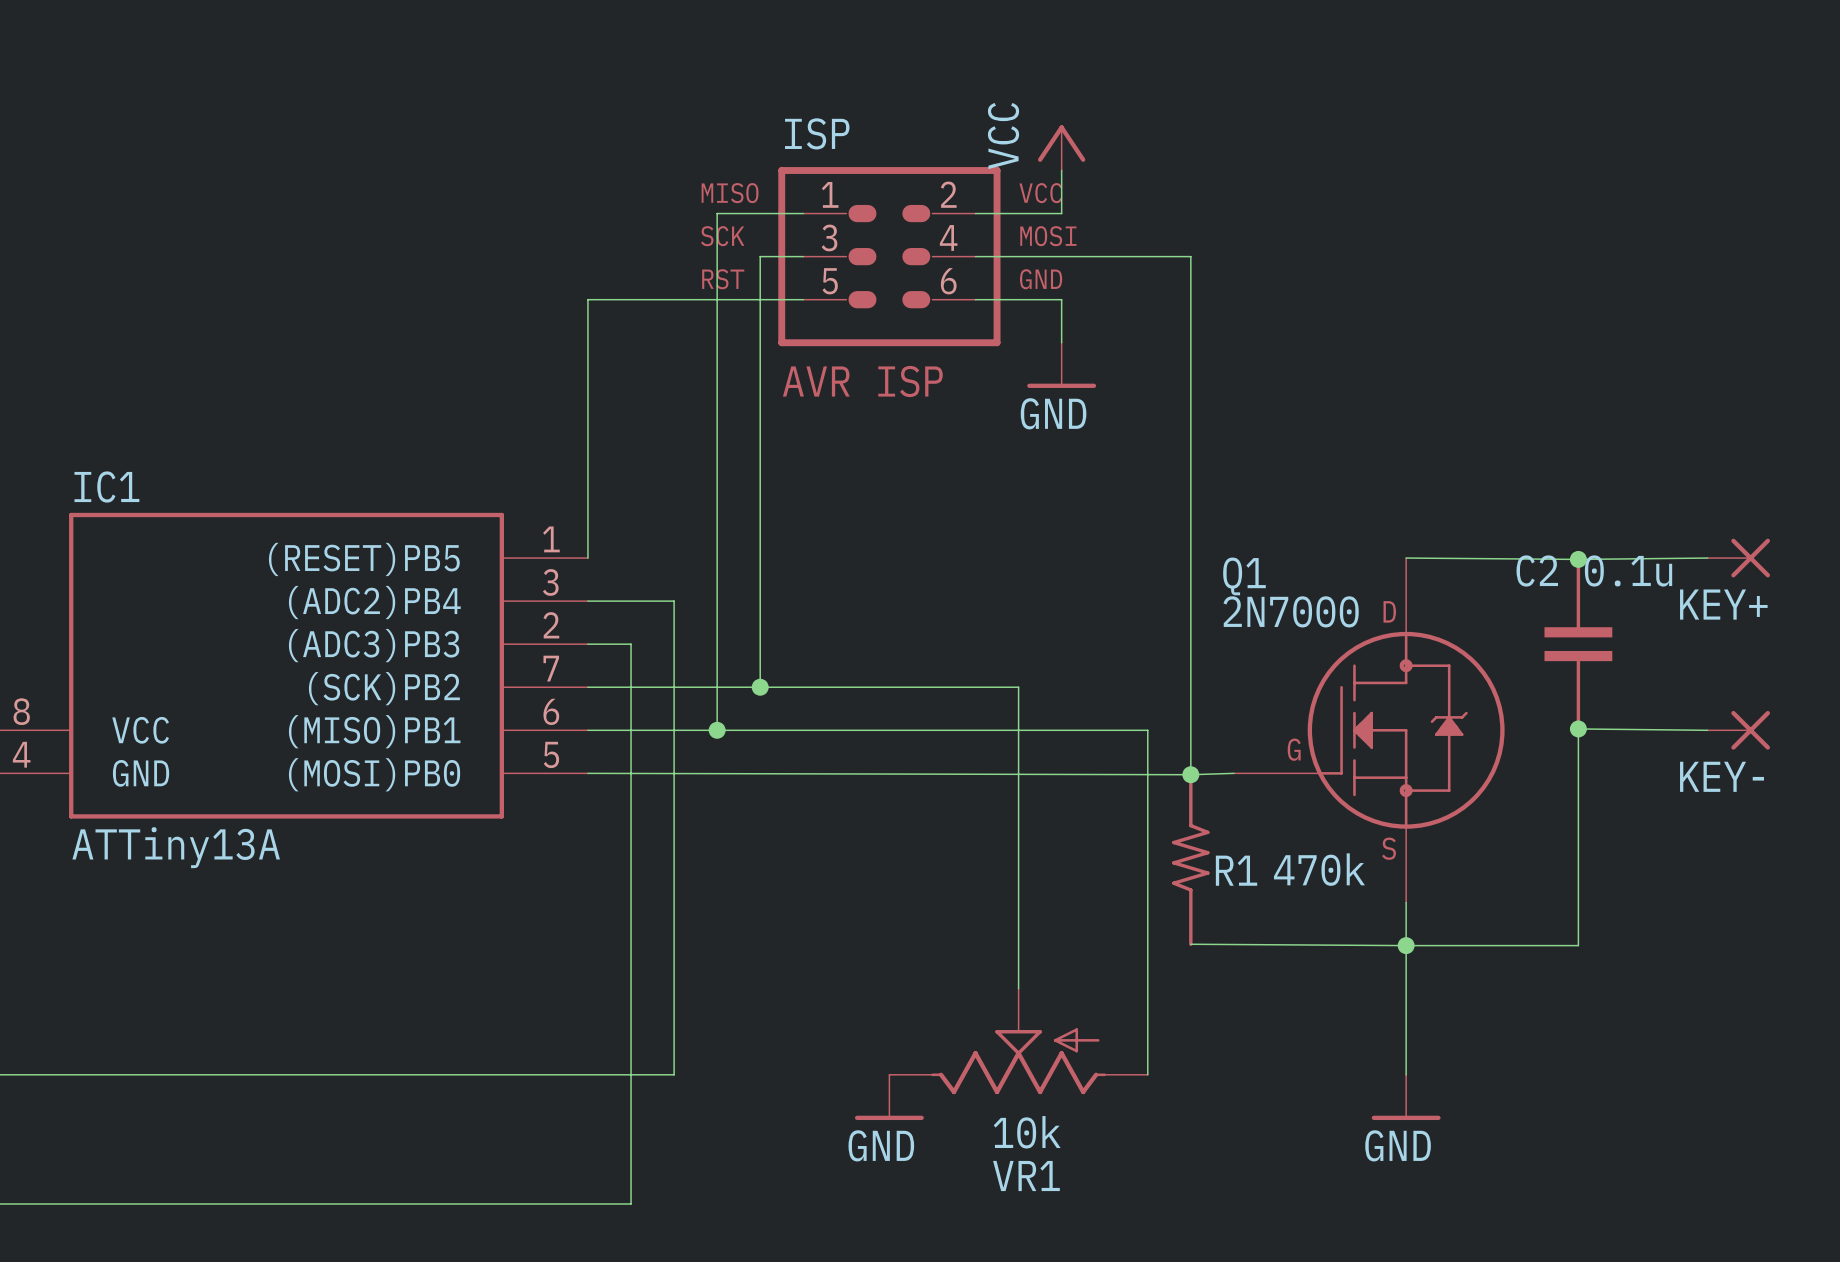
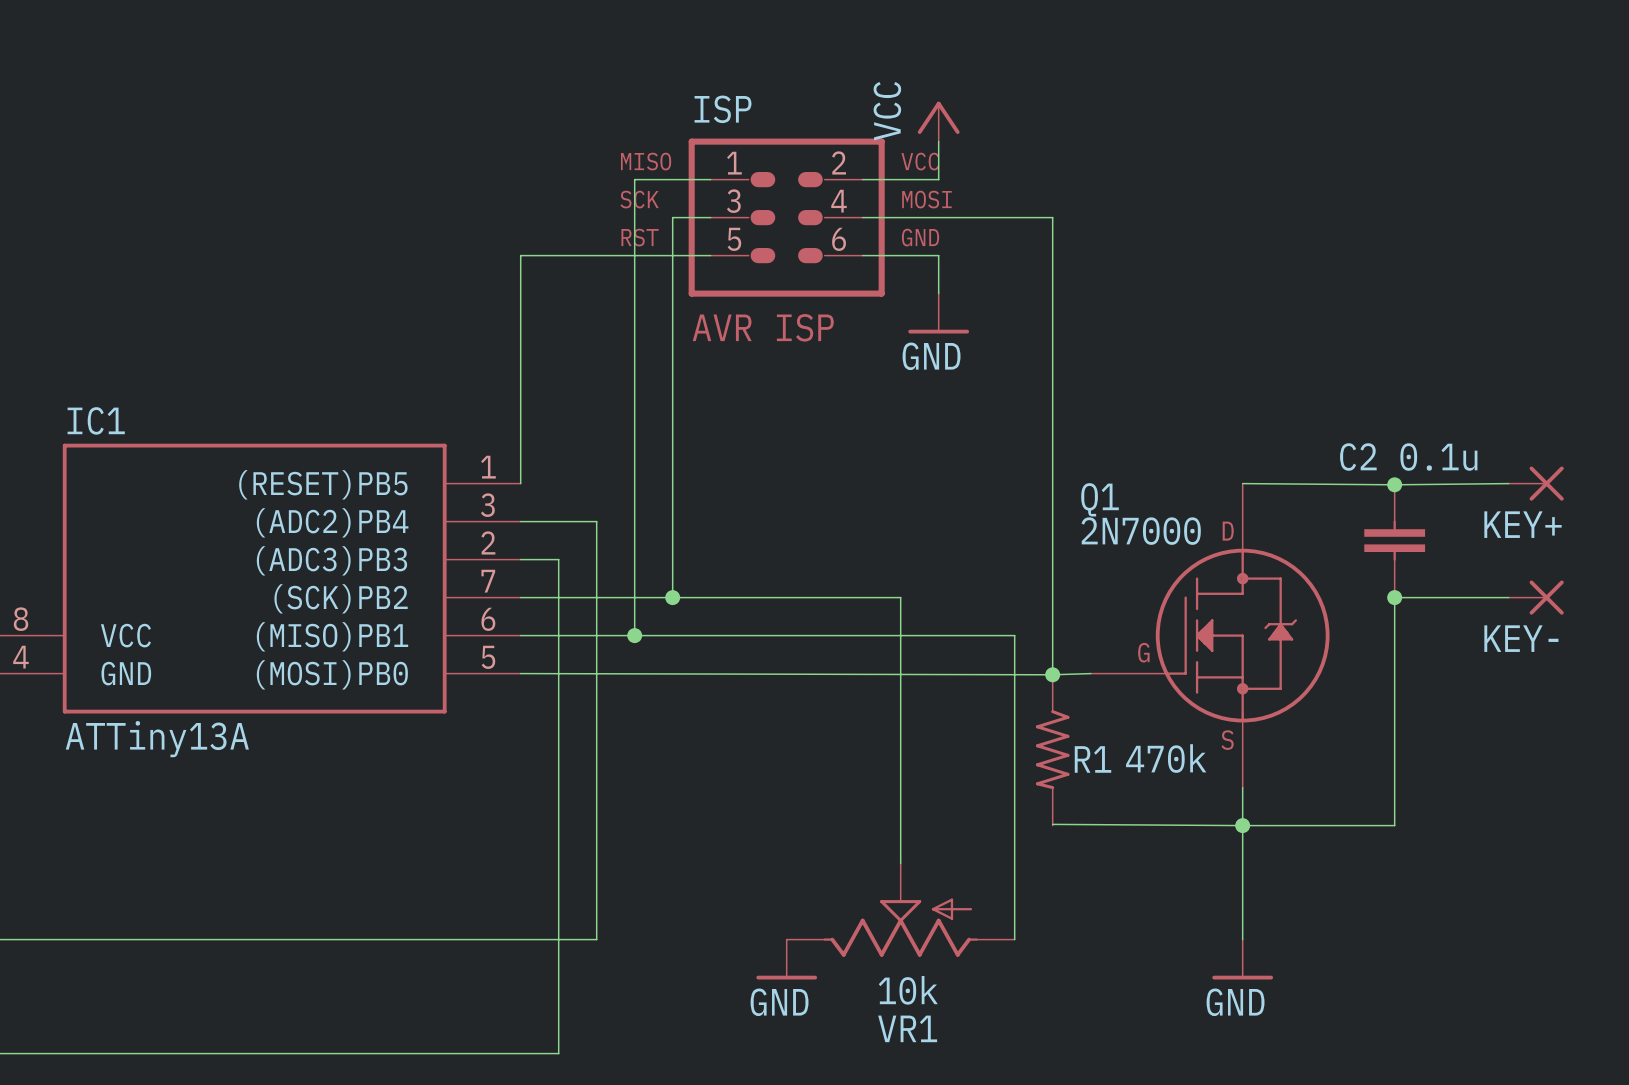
C2 symbol: [1544, 557, 1613, 731] -> [1364, 483, 1426, 598]
wire: (1578, 728) (1707, 730) -> (1394, 634) (1394, 597) (1508, 597)
junction position: (1578, 728) -> (1394, 597)
KEY- position: (1738, 730) -> (1536, 597)
R1 symbol: [1172, 773, 1210, 946] -> [1035, 673, 1070, 826]

